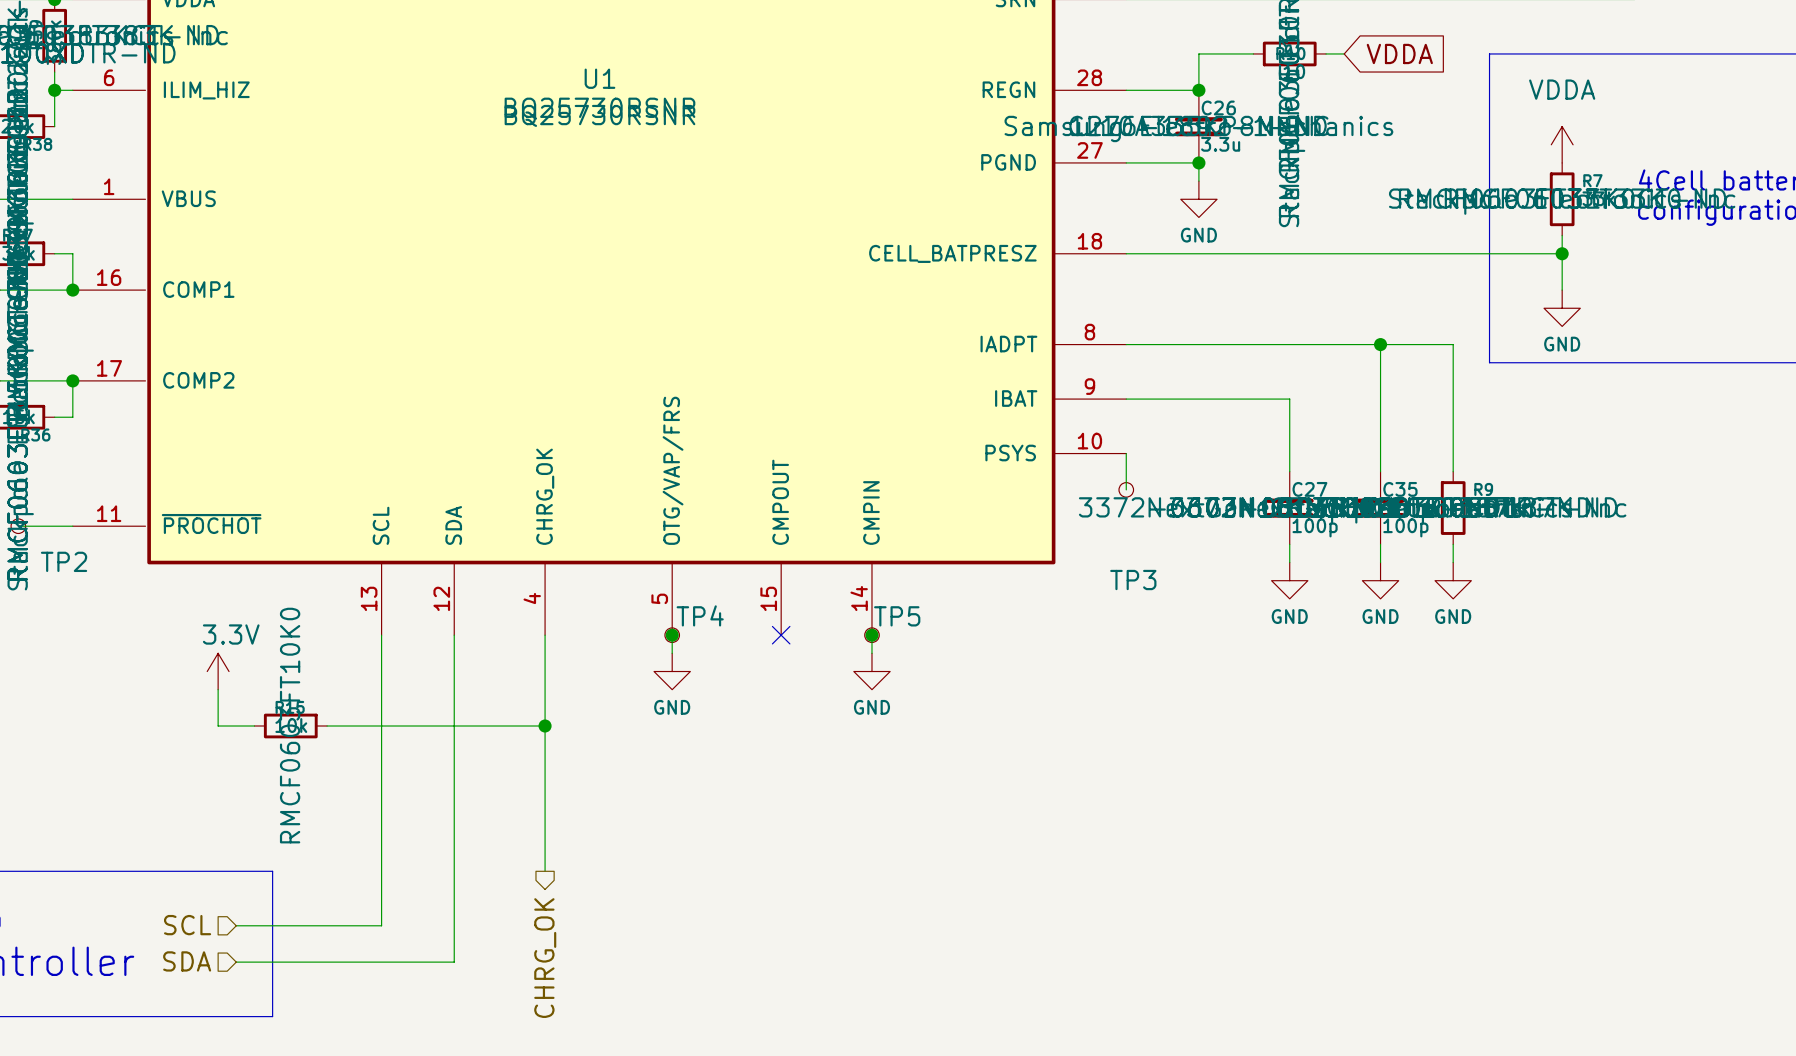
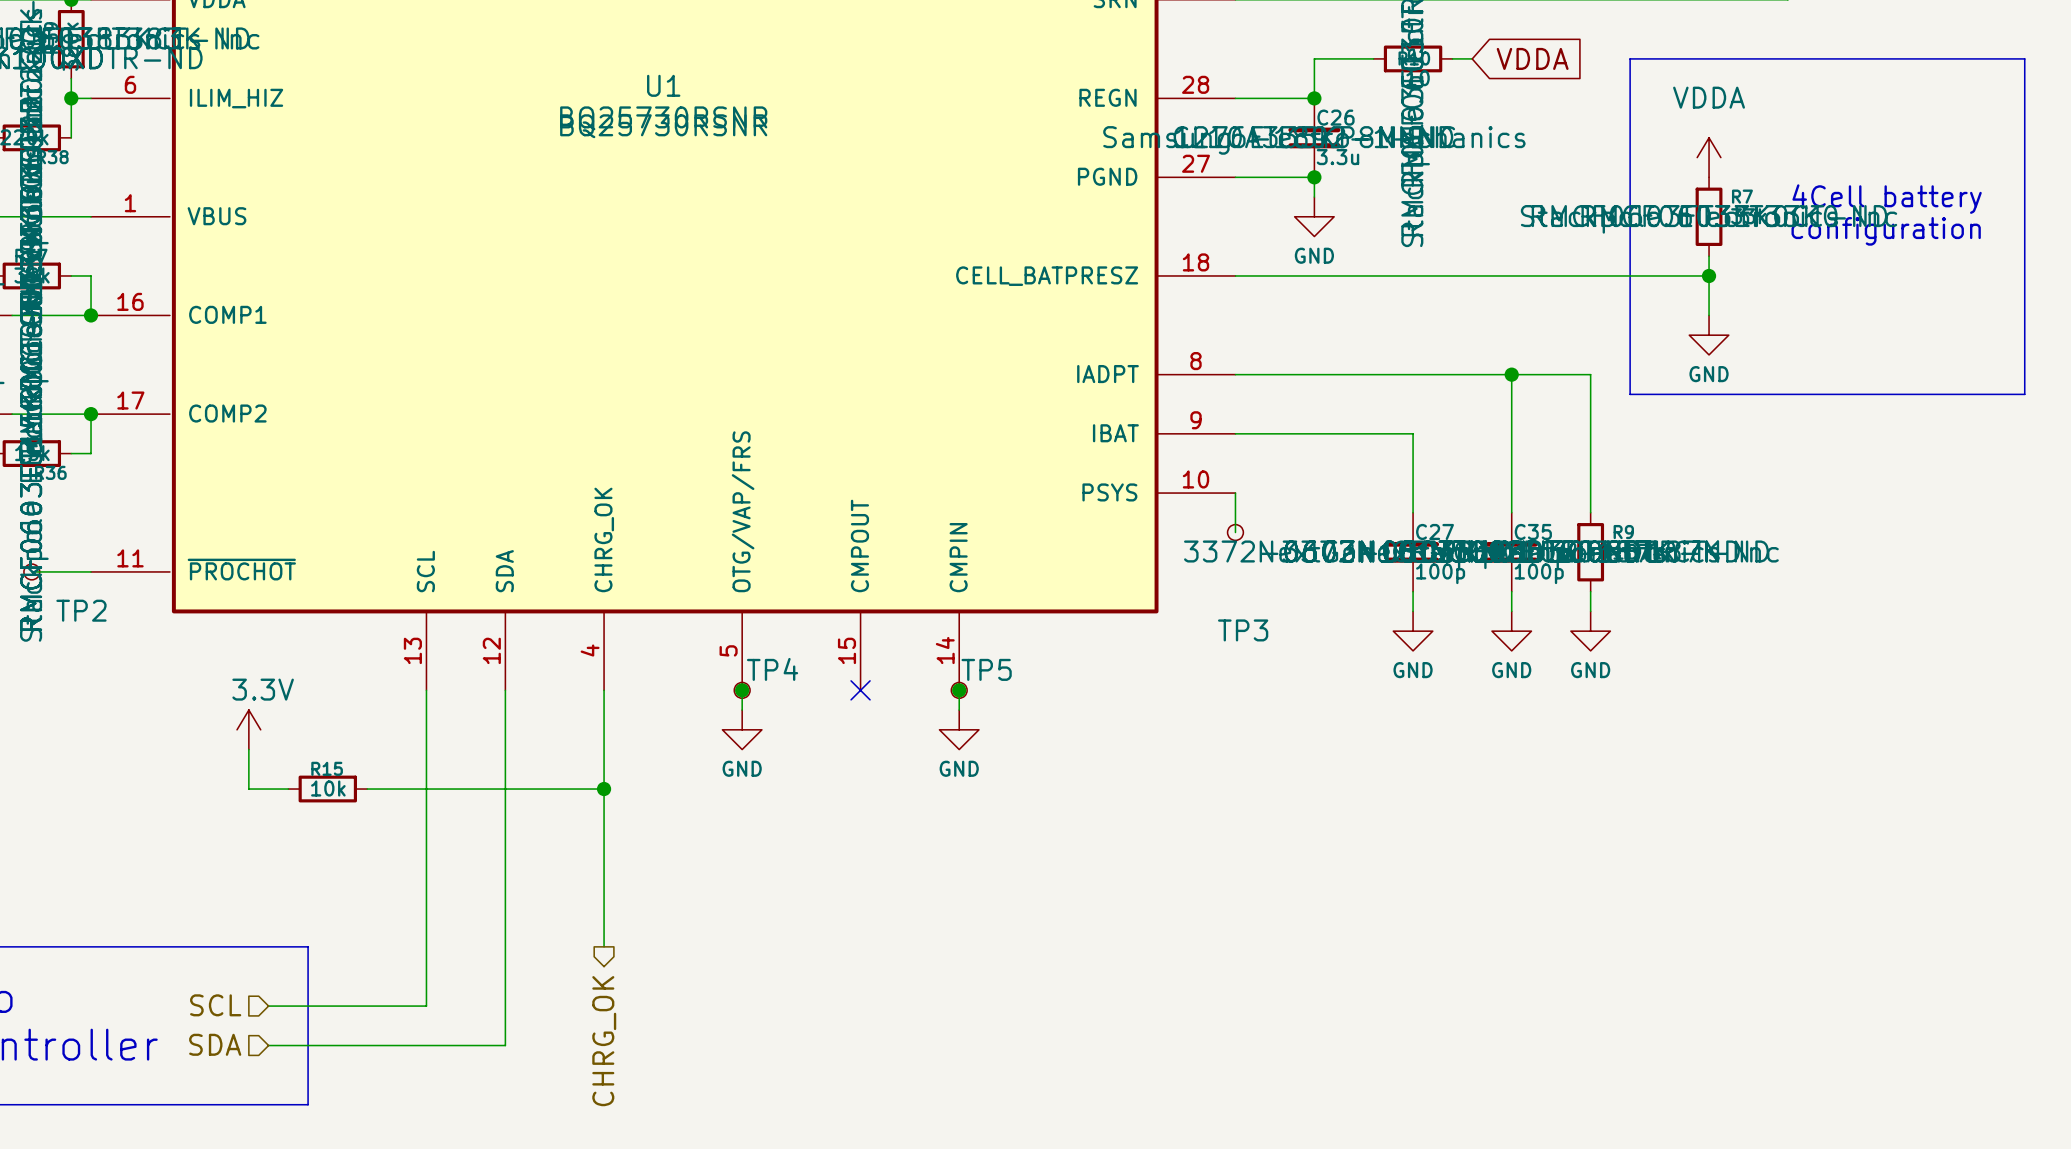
R15 text: RMCF0603FT10K0 (290, 725) -> none

